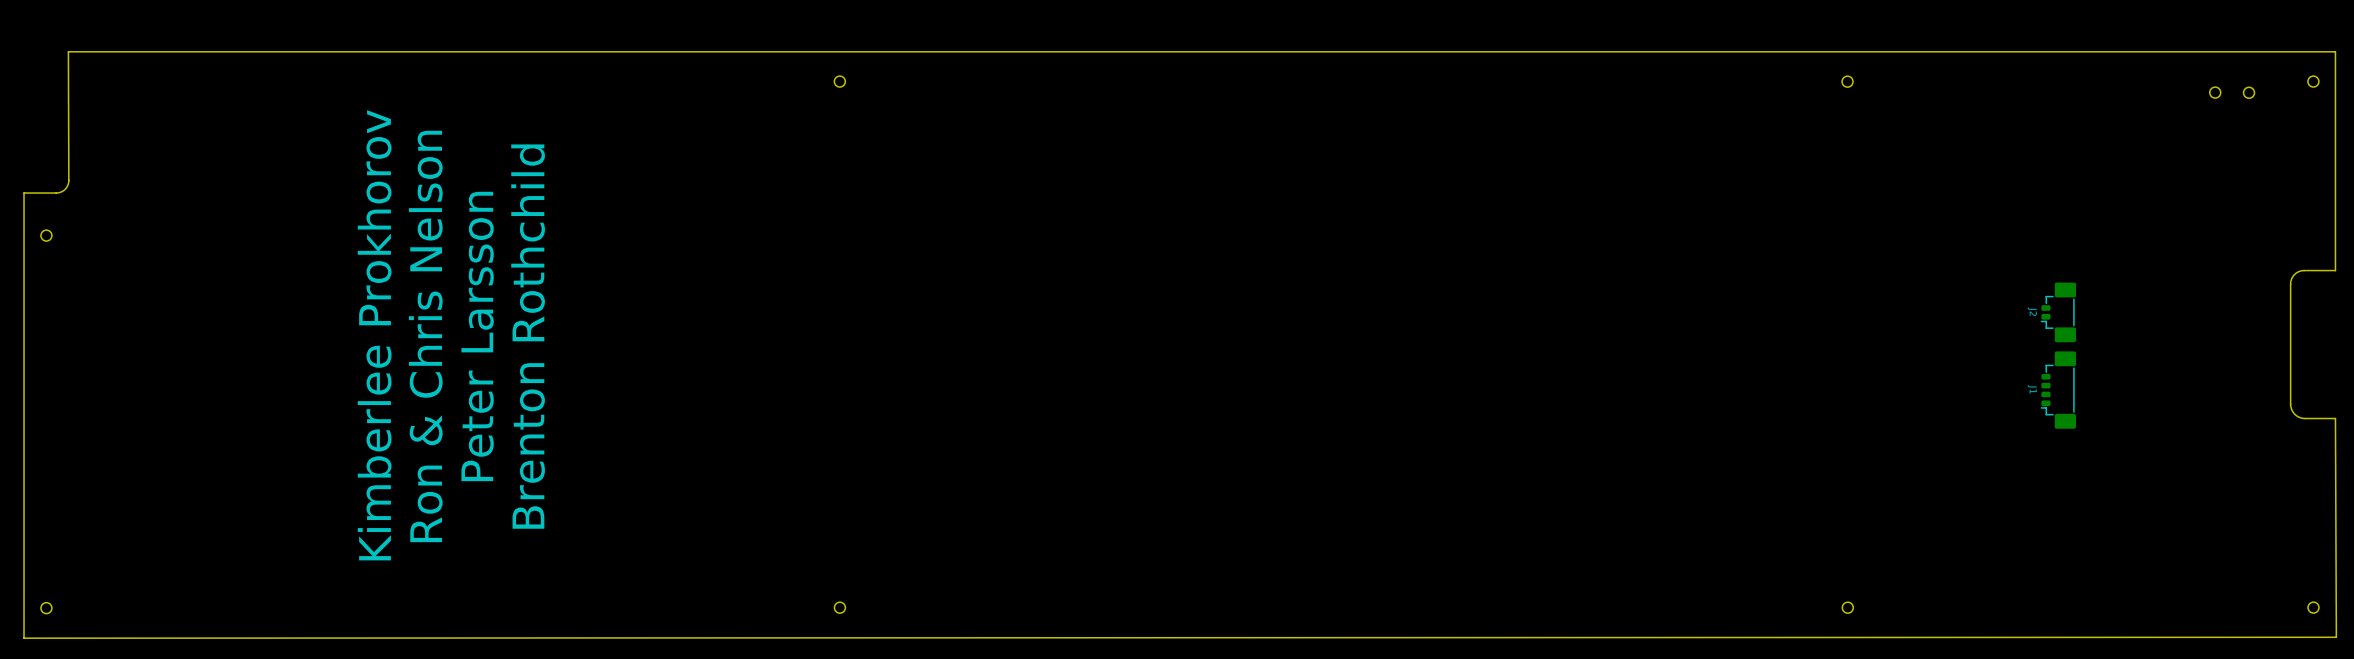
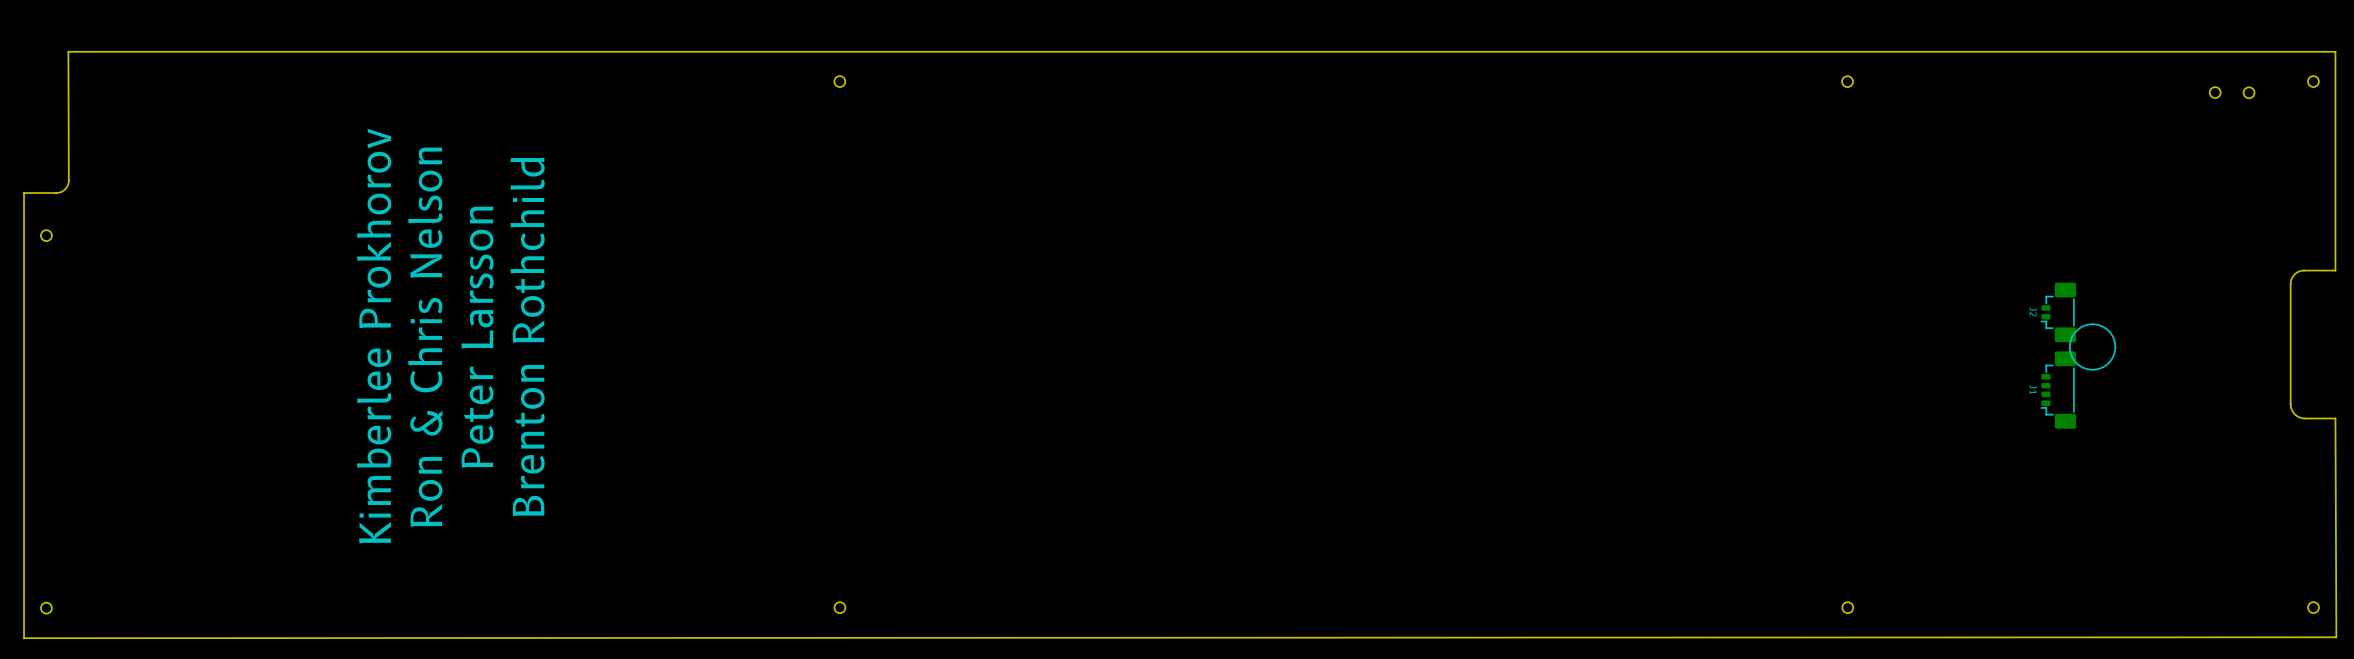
drawing: none -> [2069, 323, 2116, 371]

